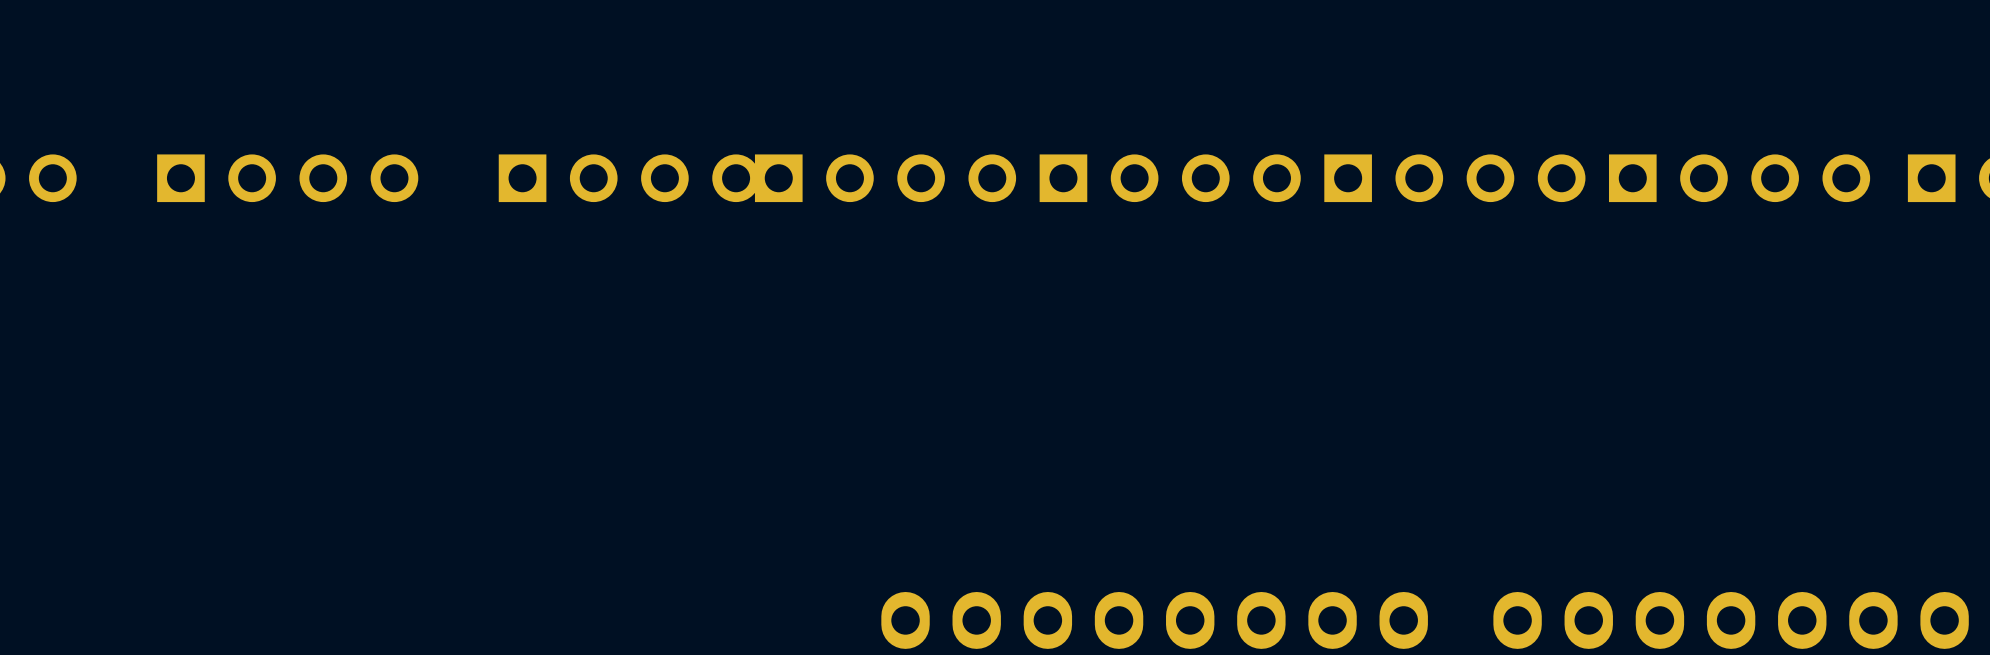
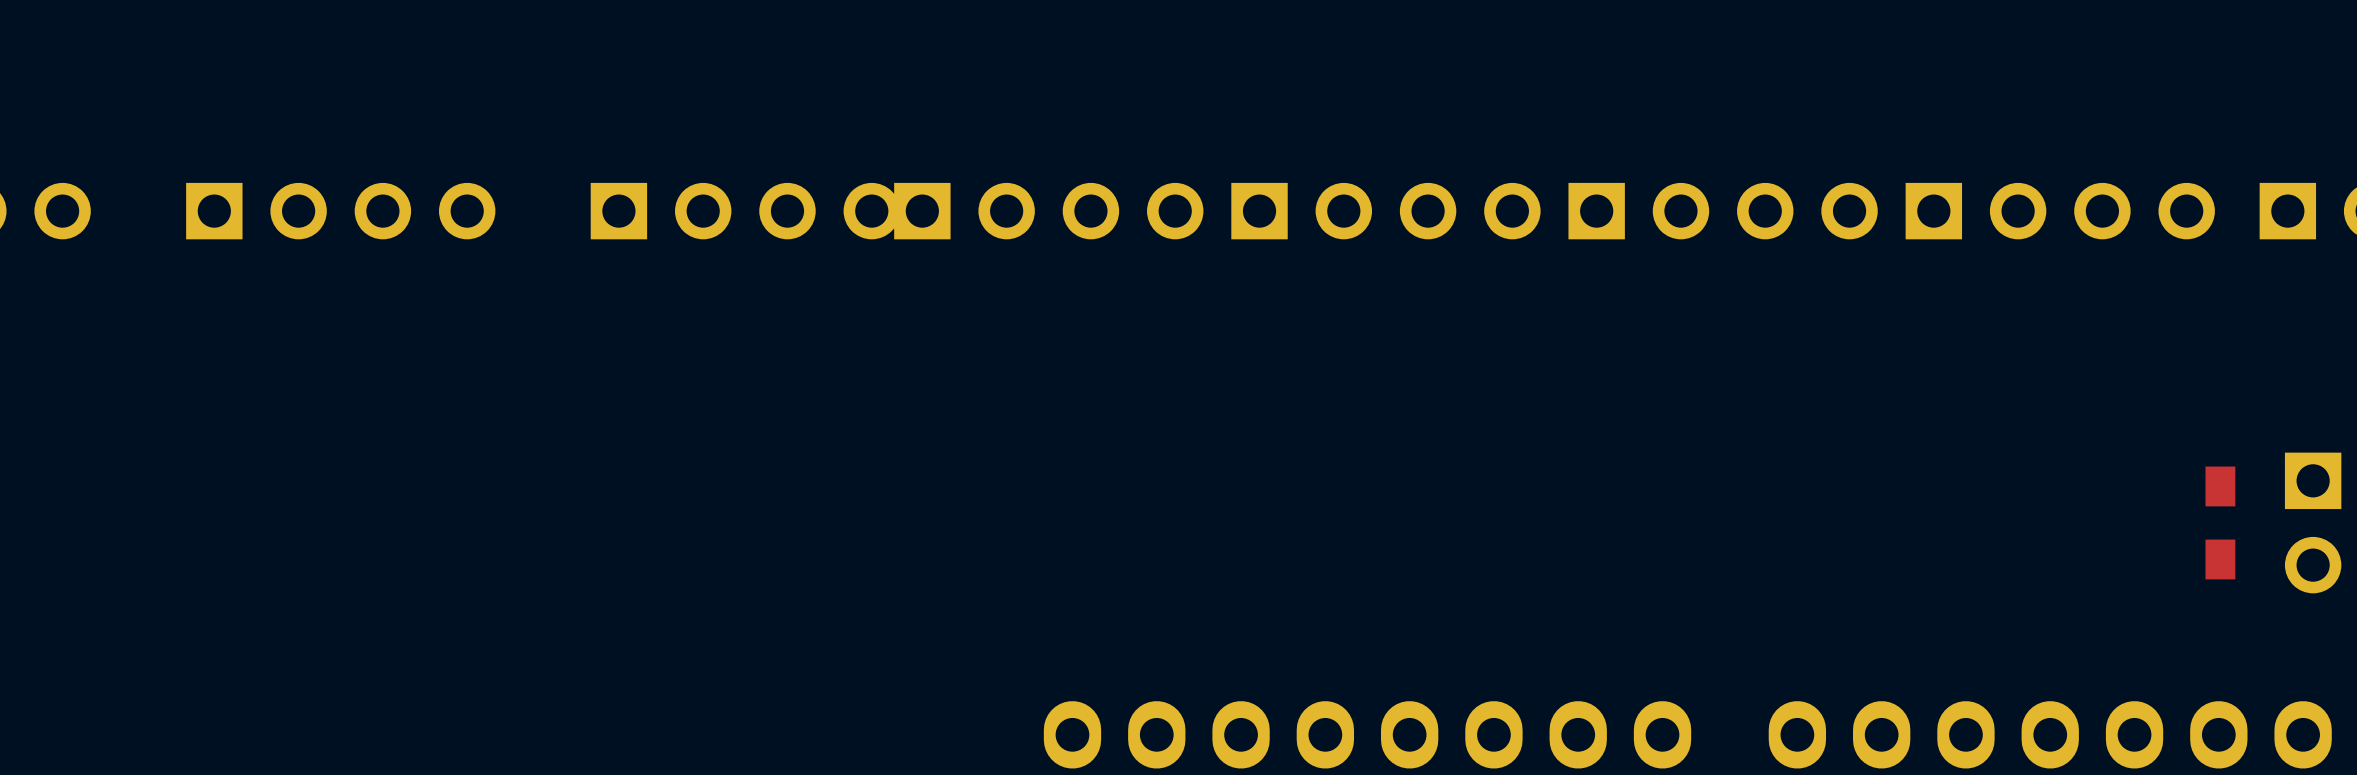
part: none -> (2220, 522)
part: none -> (2313, 522)

